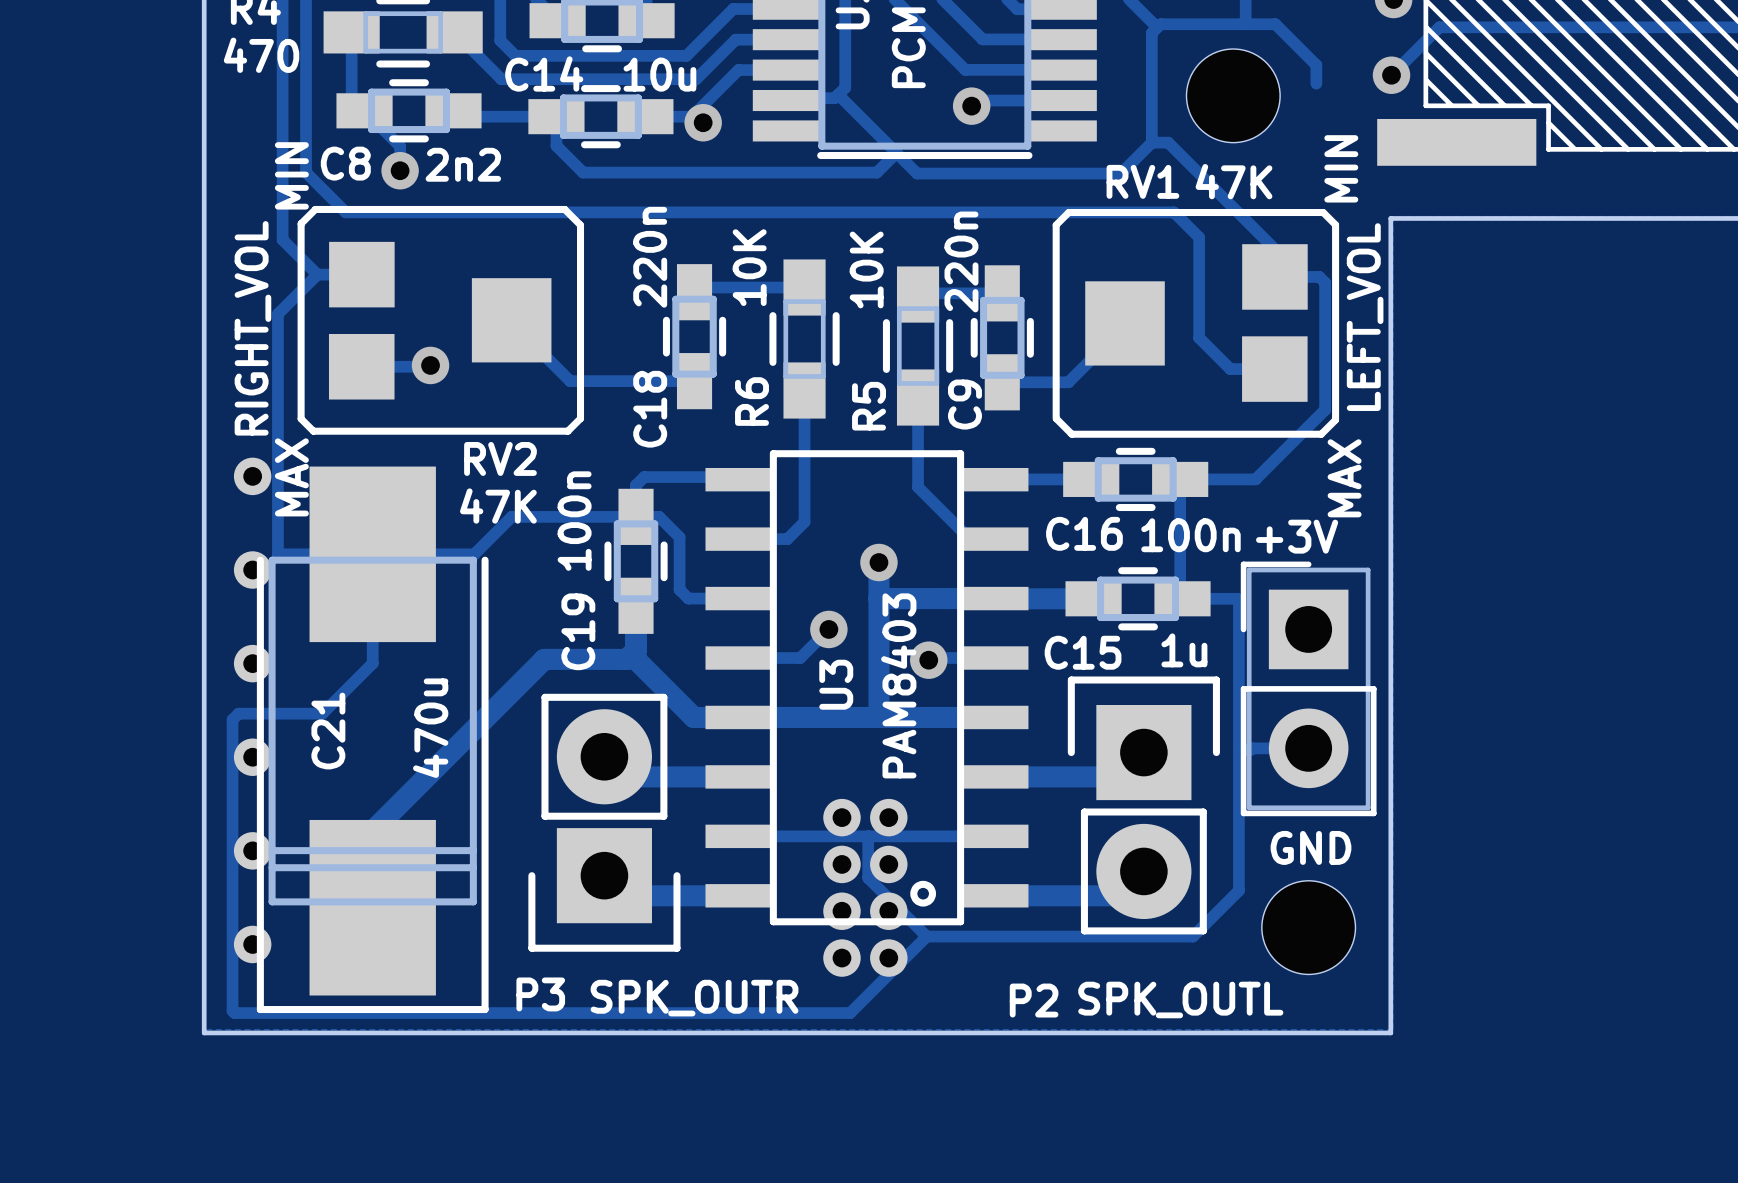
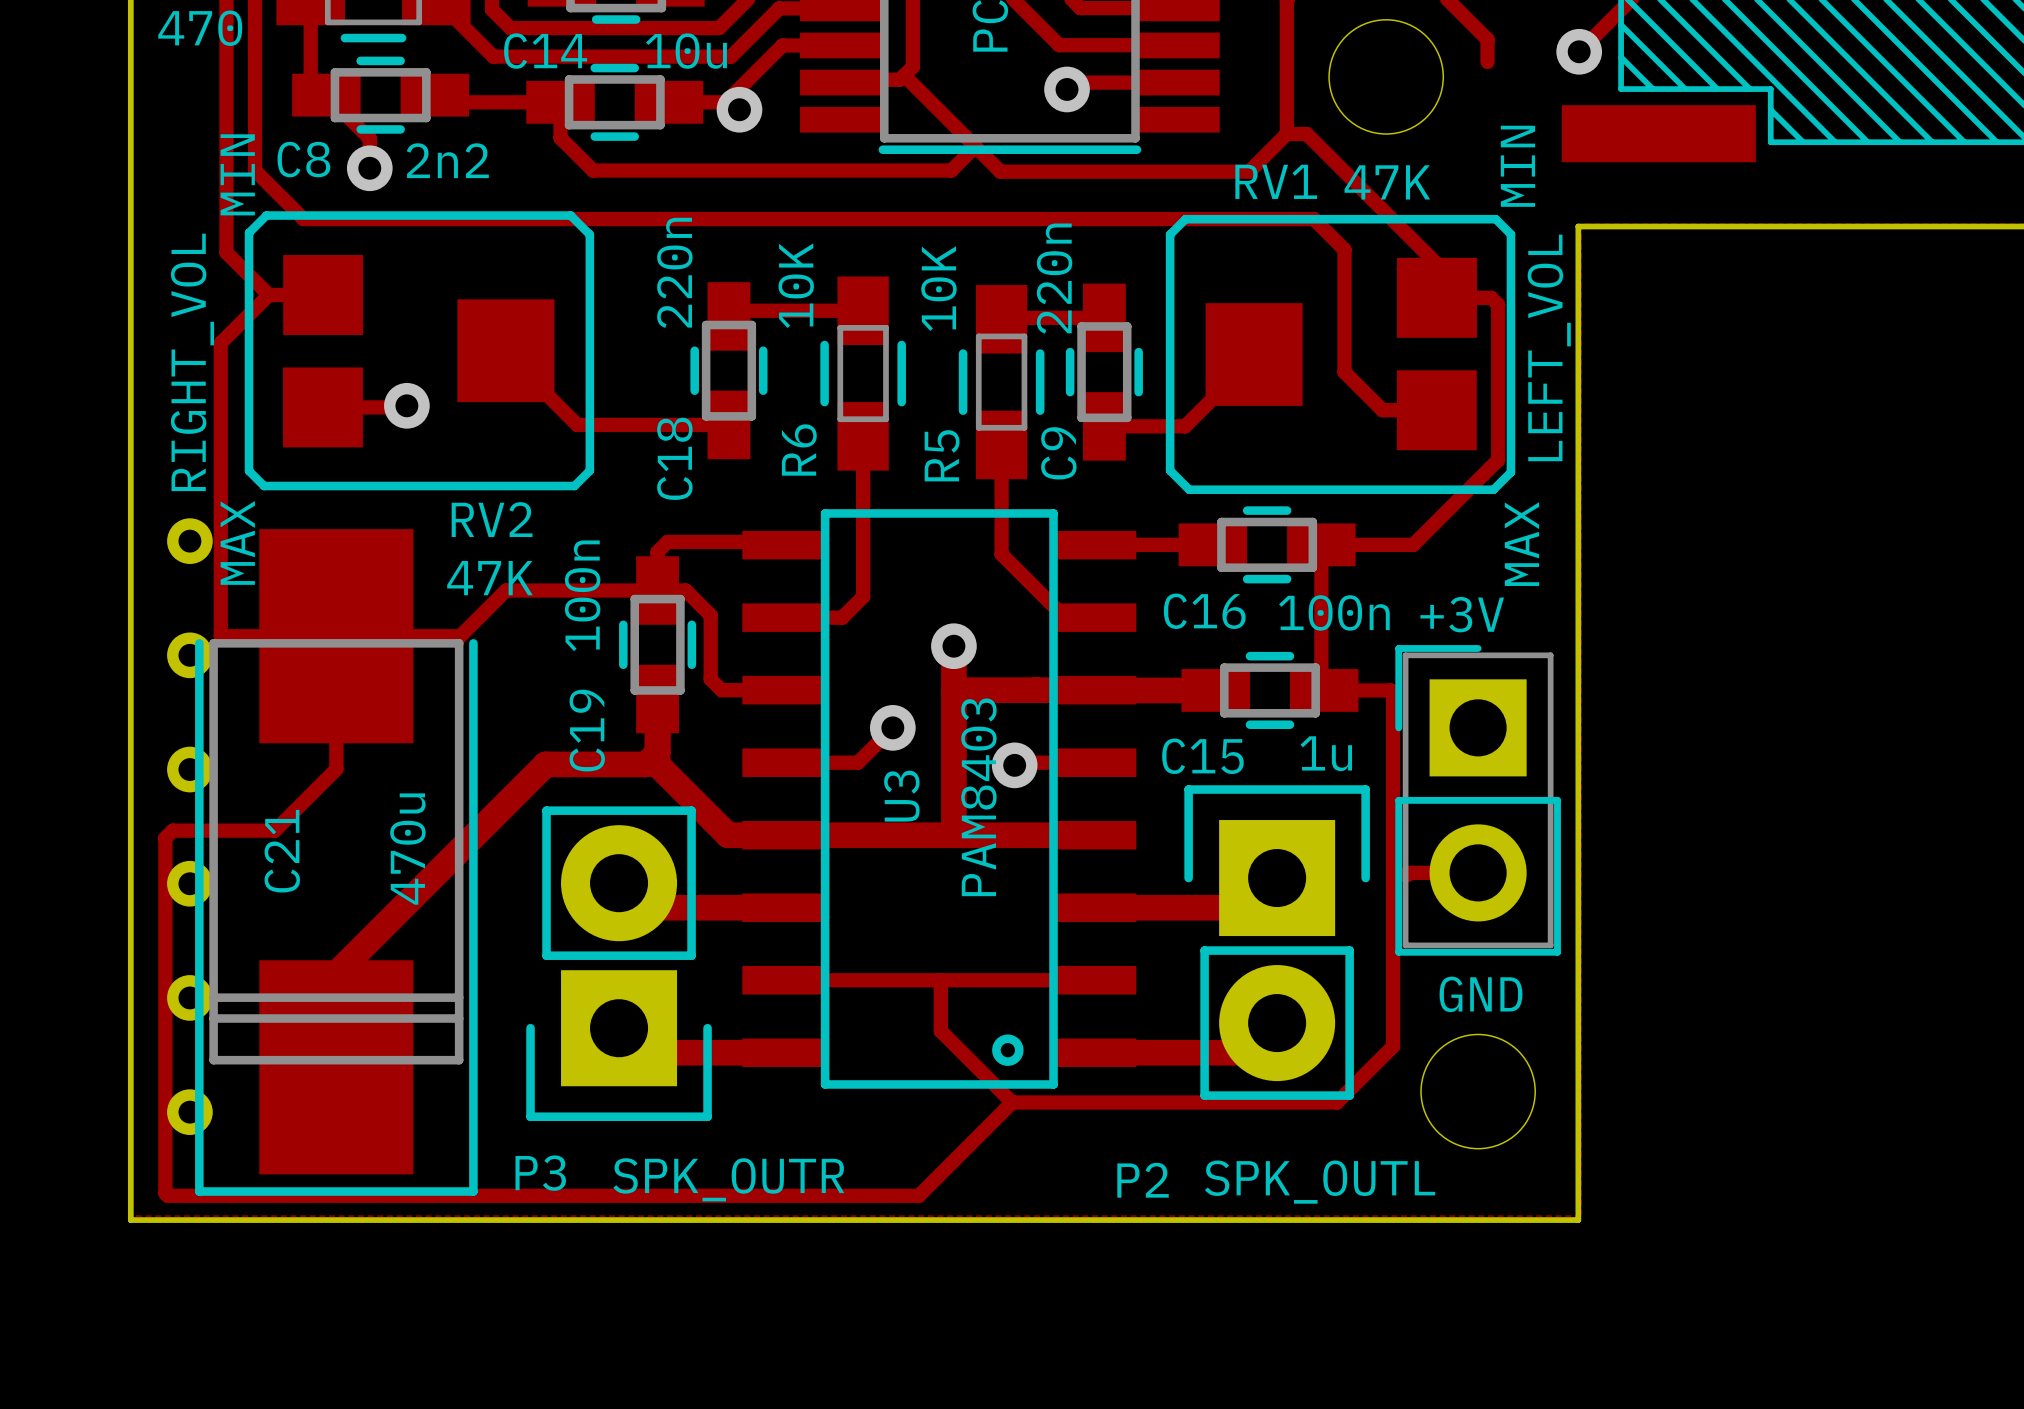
part: (841, 817) -> none
part: (888, 817) -> none
part: (841, 864) -> none
part: (888, 864) -> none
part: (841, 911) -> none
part: (888, 911) -> none
part: (841, 958) -> none
part: (888, 958) -> none

